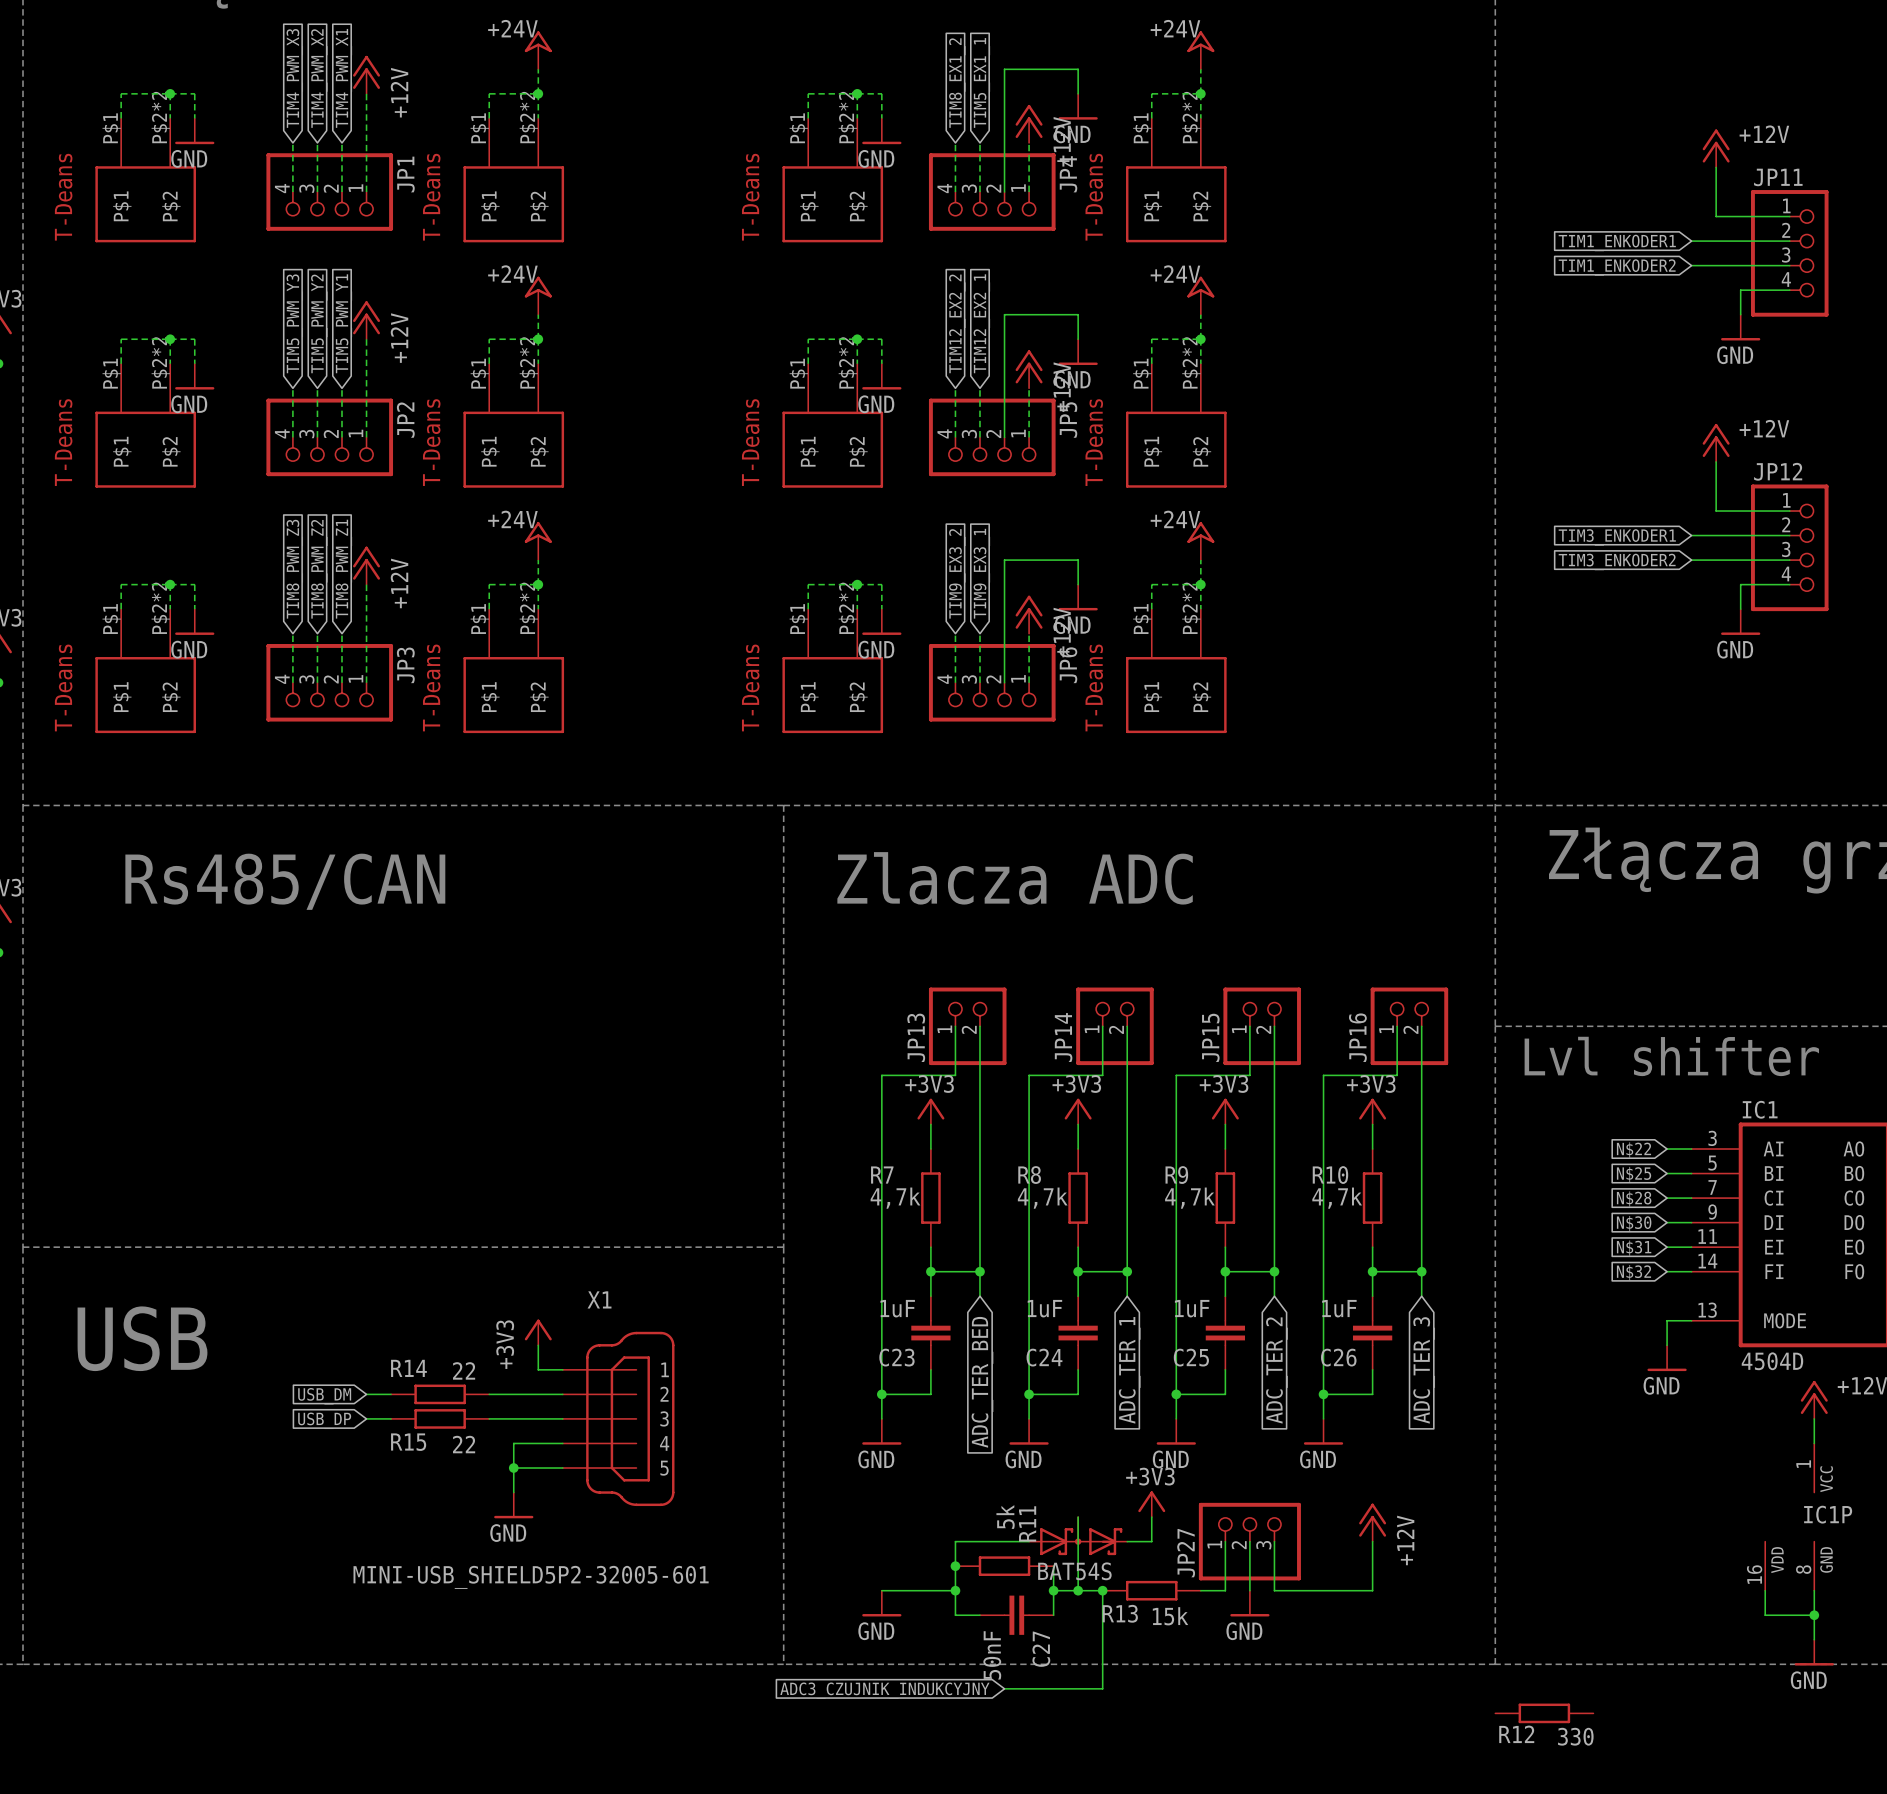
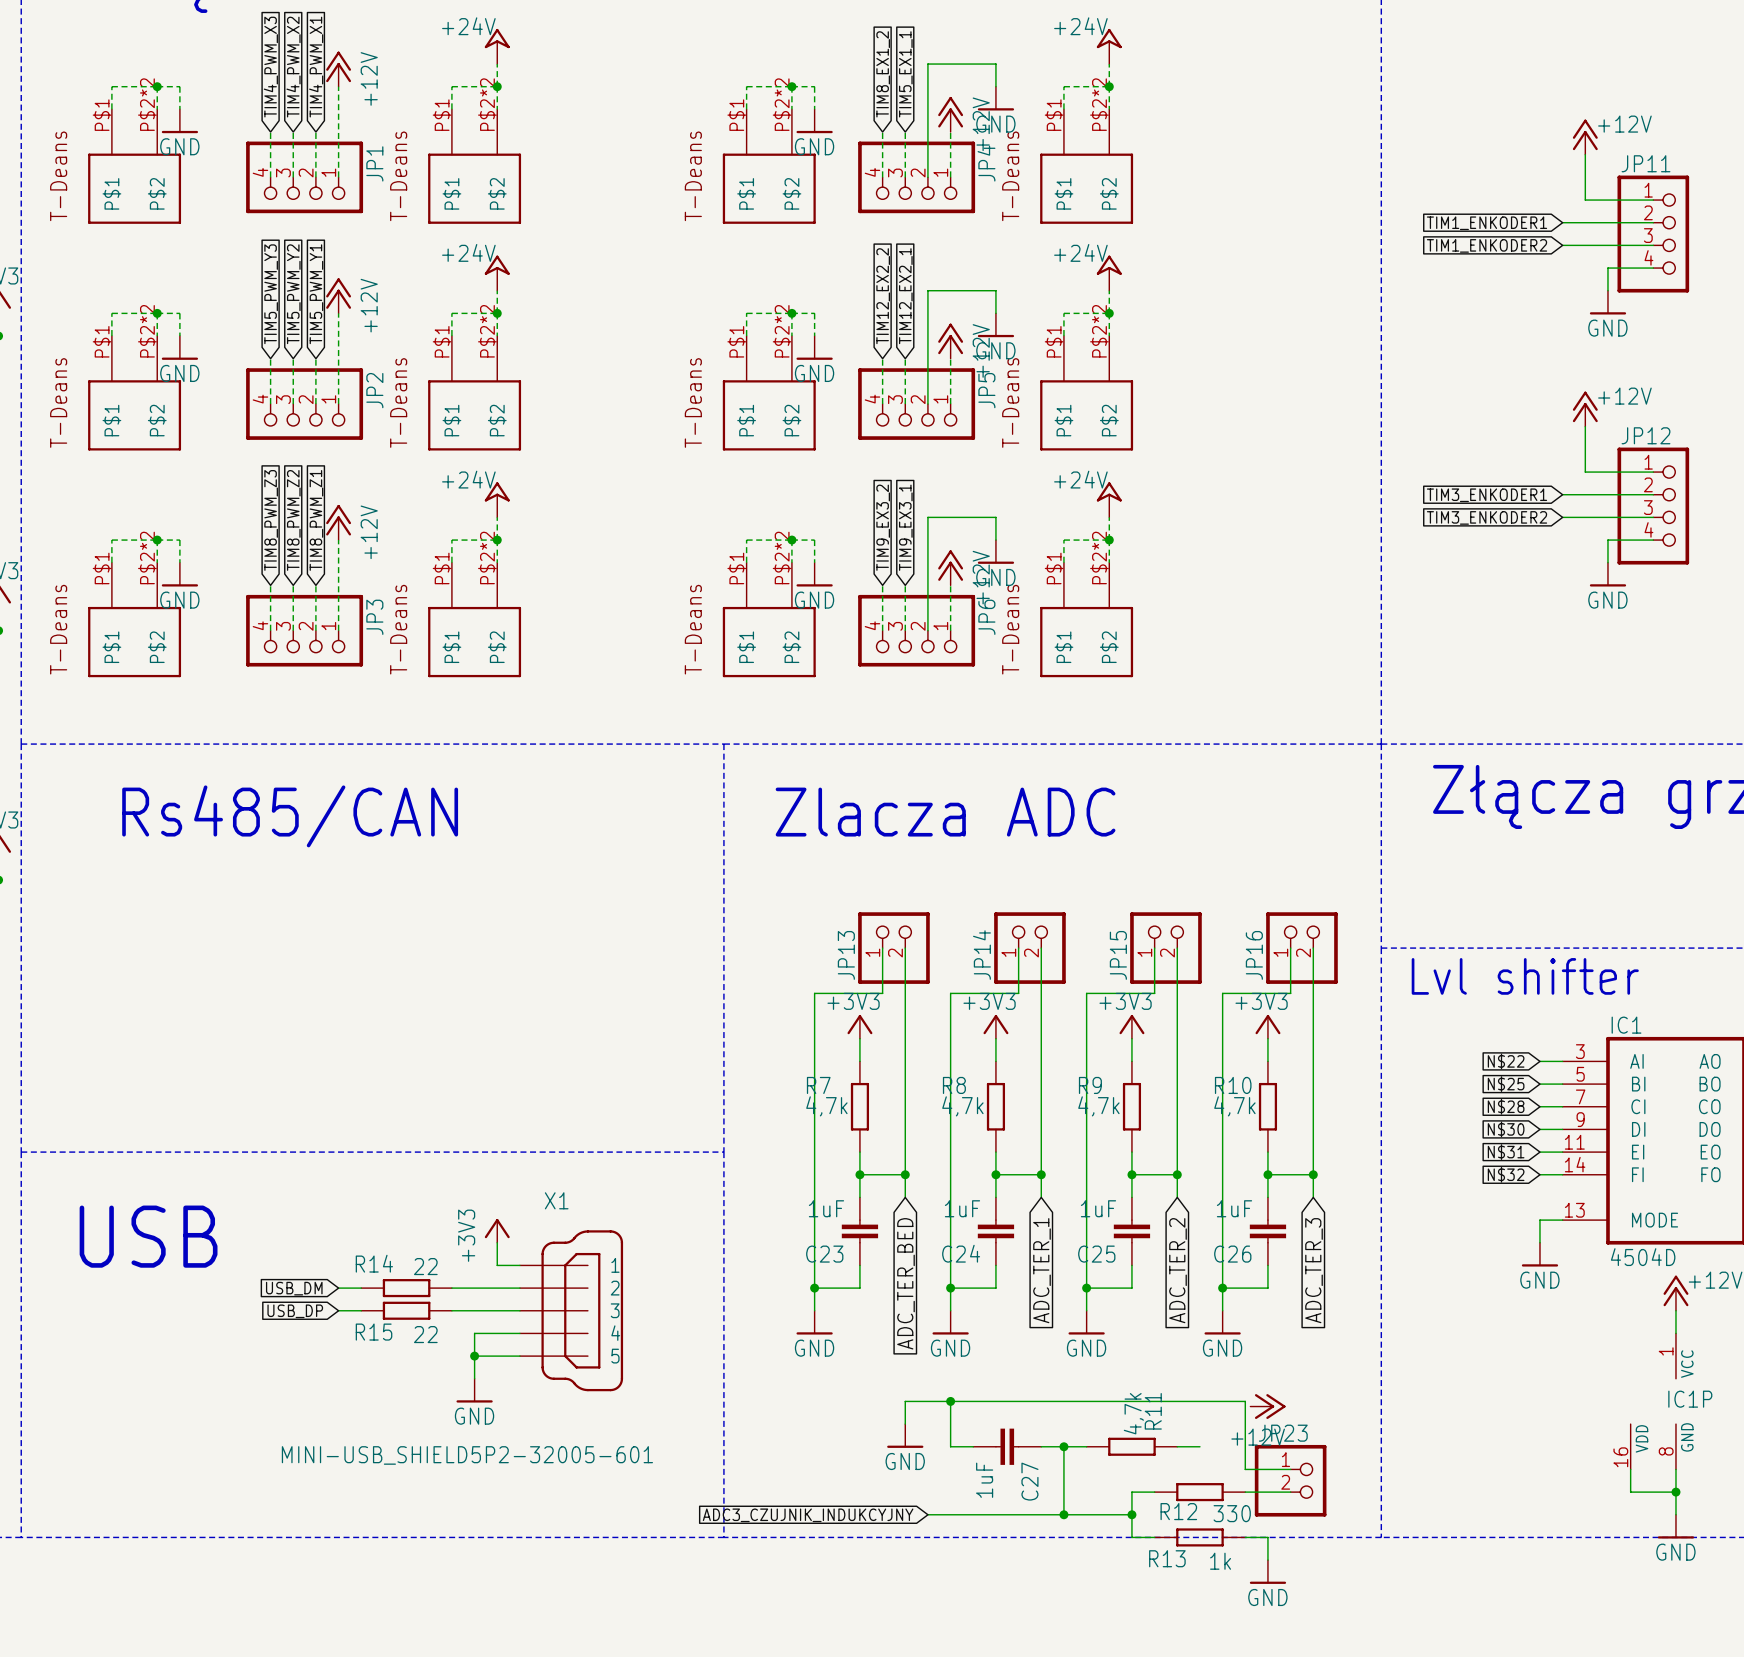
power symbol: +3V3 (1151, 1504) -> none
R11 value: 5k (1005, 1517) -> 4,7k (1133, 1413)
junction: none -> (950, 1401)
wire: (1078, 1517) (1078, 1590) -> (1063, 1446) (1063, 1514)
wire: (1151, 1517) (1151, 1541) (1127, 1541) -> none
power symbol rotation: 0° (1372, 1520) -> 90° clockwise (1270, 1406)
part: BAT54S (1078, 1536) -> none
wire: (1029, 1541) (955, 1541) (955, 1615) (979, 1615) -> none
wire: (1225, 1541) (1225, 1590) (1200, 1590) -> none
wire: (1249, 1541) (1249, 1590) -> none
JP27: (1249, 1541) -> none
wire: (1274, 1541) (1274, 1590) (1348, 1590) -> (905, 1424) (905, 1401) (1245, 1401) (1245, 1469)
wire: (1372, 1541) (1372, 1590) -> (1290, 1469) (1267, 1469)
junction: (955, 1566) -> none
R11 position: (1004, 1566) -> (1131, 1446)
wire: (1053, 1566) (1053, 1615) -> (973, 1446) (950, 1446) (950, 1401)
wire: none -> (1041, 1446) (1086, 1446)
junction: none -> (1063, 1446)
wire: none -> (1177, 1446) (1199, 1446)
wire: (881, 1590) (955, 1590) -> none
junction: (955, 1590) -> none
wire: (1053, 1590) (1102, 1590) (1102, 1688) (1004, 1688) -> none
junction: (1053, 1590) -> none
junction: (1078, 1590) -> none
junction: (1102, 1590) -> none
R13 position: (1151, 1590) -> (1199, 1537)
JP23: none -> (1290, 1480)
power symbol position: GND (881, 1603) -> GND (905, 1436)
power symbol: GND (1249, 1603) -> none
C27 position: (1016, 1615) -> (1007, 1446)
wire: none -> (1154, 1492) (1131, 1492) (1131, 1537) (1154, 1537)
wire: none -> (1245, 1492) (1290, 1492)
R13 value: 15k (1170, 1616) -> 1k (1220, 1561)
wire: none -> (927, 1514) (1131, 1514)
junction: none -> (1063, 1514)
junction: none -> (1131, 1514)
C27 value: 50nF (992, 1655) -> 1uF (984, 1480)
wire: none -> (1245, 1537) (1267, 1537) (1267, 1560)
global label position: ADC3_CZUJNIK_INDUKCYJNY (884, 1690) -> ADC3_CZUJNIK_INDUKCYJNY (808, 1515)
power symbol: none -> GND (1267, 1572)
R12 position: (1544, 1713) -> (1199, 1492)

